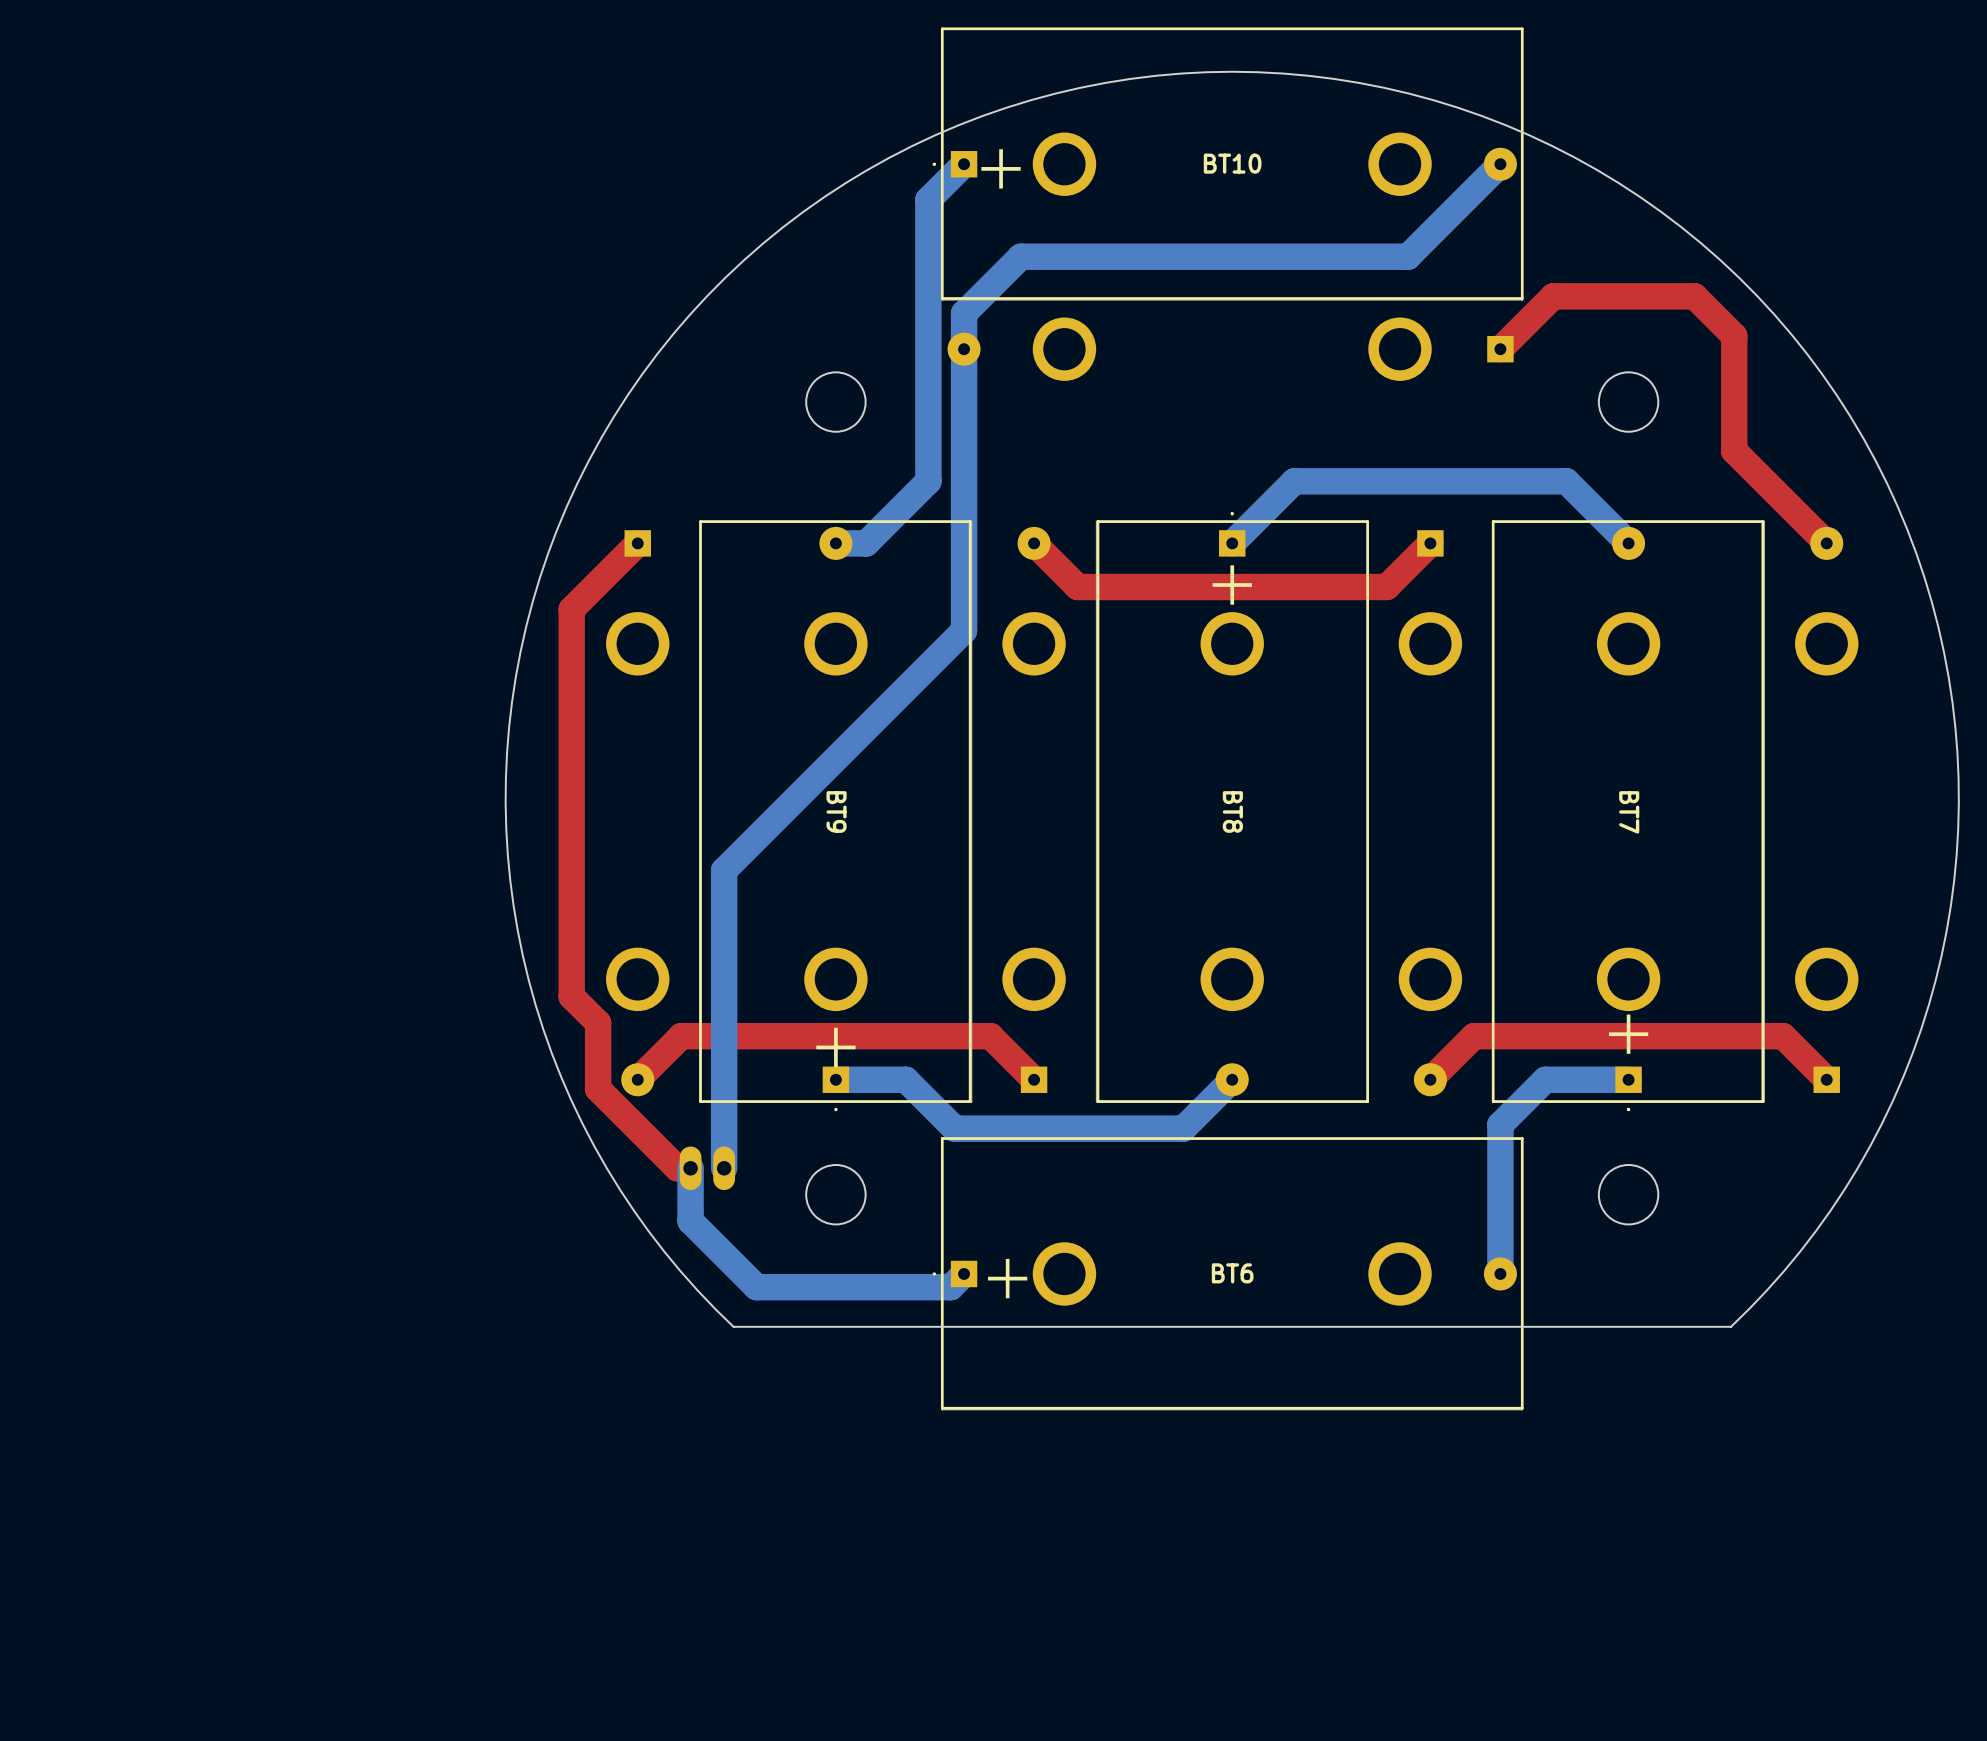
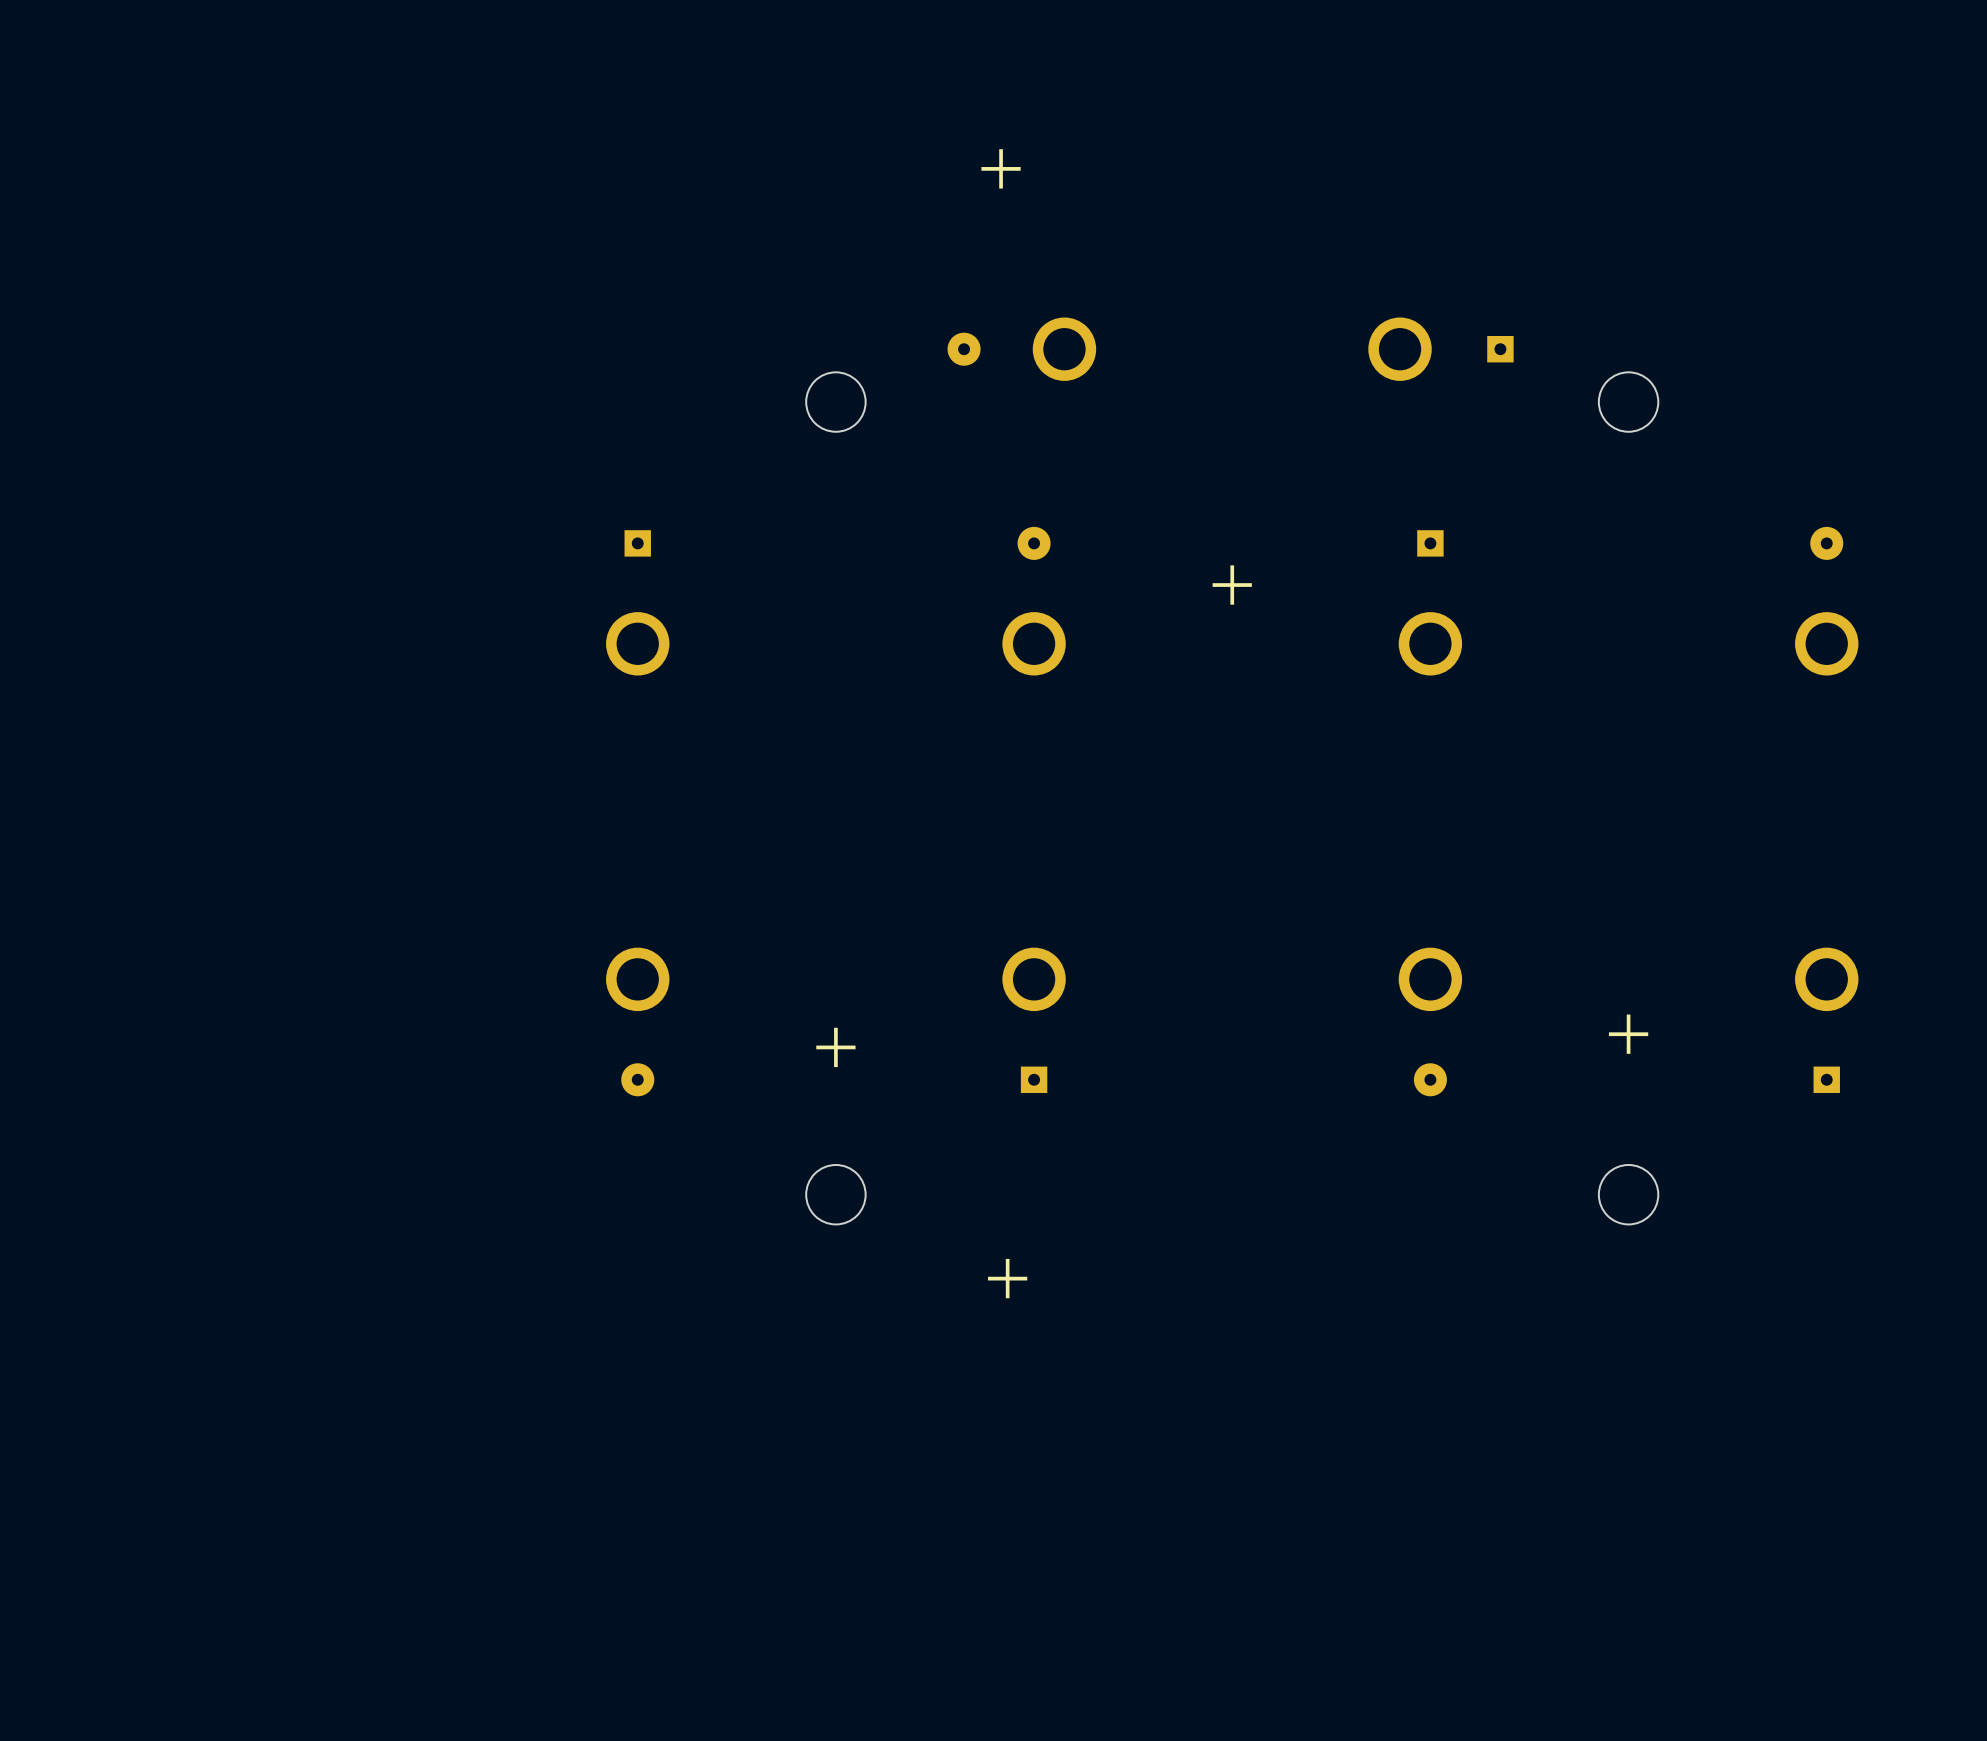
BT10: (1228, 163) -> none
bottom track: (964, 164) (928, 199) (928, 481) (866, 543) (835, 543) -> none
bottom track: (1500, 164) (1407, 256) (1020, 256) (964, 313) (964, 630) (724, 870) (724, 1168) -> none
top track: (1500, 349) (1553, 296) (1694, 296) (1734, 335) (1734, 450) (1826, 543) -> none
top track: (637, 543) (571, 609) (571, 996) (598, 1022) (598, 1089) (677, 1168) (690, 1168) -> none
top track: (1430, 543) (1386, 587) (1077, 587) (1034, 543) -> none
bottom track: (1628, 543) (1566, 481) (1294, 481) (1232, 543) -> none
BT8: (1232, 807) -> none
BT9: (835, 815) -> none
BT7: (1628, 815) -> none
top track: (1034, 1079) (990, 1036) (681, 1036) (637, 1079) -> none
bottom track: (1232, 1079) (1183, 1128) (954, 1128) (905, 1079) (835, 1079) -> none
bottom track: (1628, 1079) (1545, 1079) (1500, 1124) (1500, 1273) -> none
top track: (1826, 1079) (1783, 1036) (1474, 1036) (1430, 1079) -> none
bottom track: (690, 1168) (690, 1221) (756, 1287) (950, 1287) (964, 1273) -> none
part: (707, 1168) -> none
BT6: (1228, 1273) -> none
board edge: (1730, 1326) (733, 1326) (715, 1309) (664, 1251) (634, 1210) (594, 1145) (561, 1076) (535, 1004) (522, 955) (510, 880) (505, 803) (509, 727) (515, 677) (532, 602) (556, 530) (588, 460) (627, 394) (673, 333) (725, 277) (783, 227) (845, 183) (912, 146) (958, 125) (1031, 100) (1105, 82) (1181, 73) (1232, 71) (1283, 73) (1359, 82) (1433, 100) (1505, 125) (1574, 157) (1640, 197) (1701, 243) (1756, 295) (1806, 353) (1850, 416) (1887, 483) (1907, 530) (1924, 578) (1943, 651) (1955, 727) (1958, 803) (1954, 880) (1941, 955) (1921, 1029) (1893, 1100) (1870, 1145) (1830, 1210) (1783, 1271) (1730, 1326) -> none

